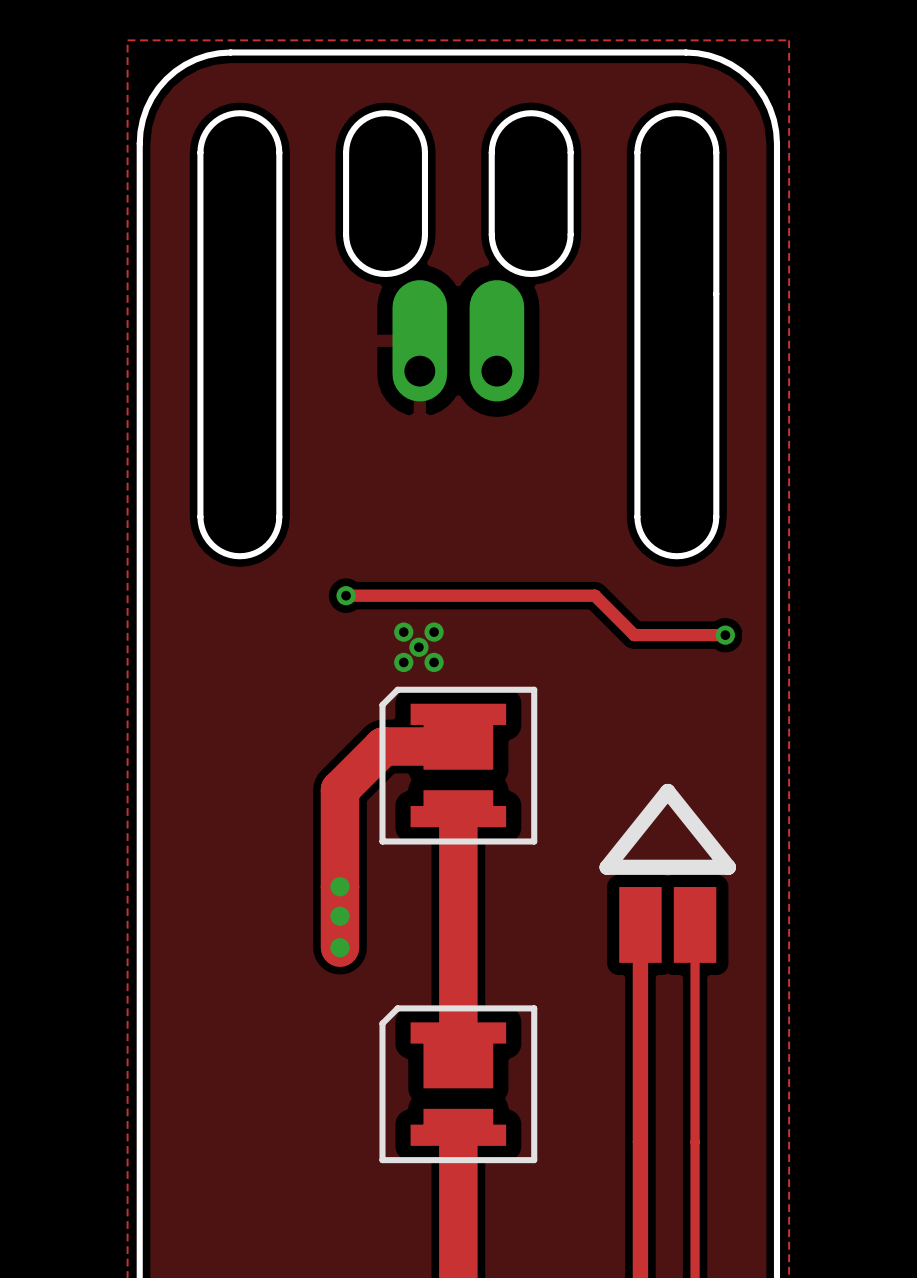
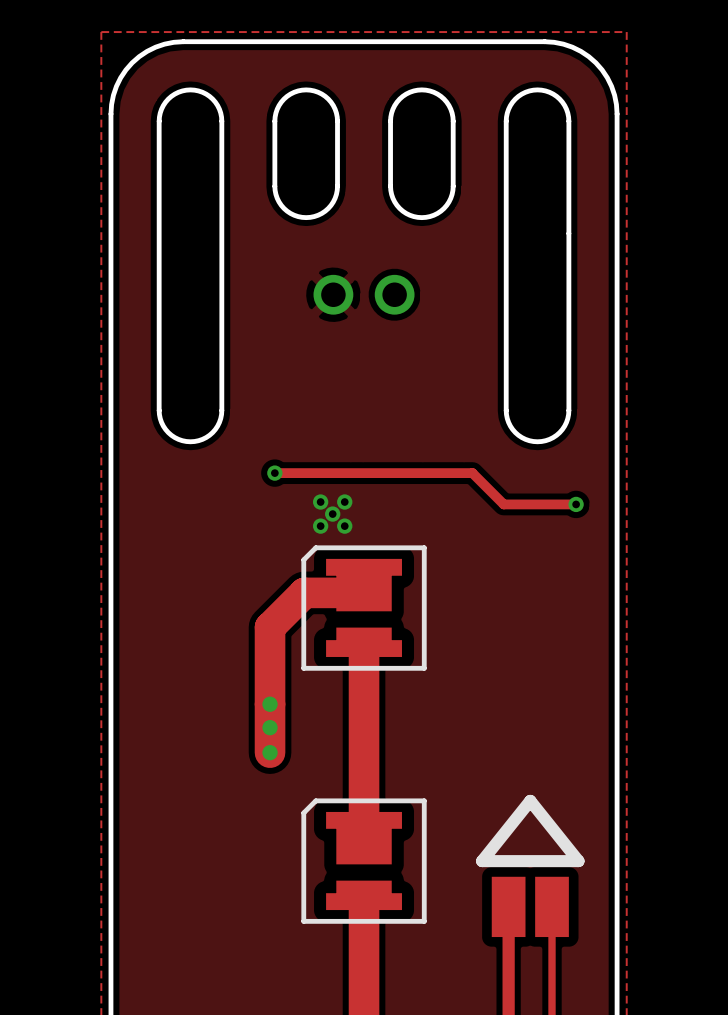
part footprint: [392, 280, 525, 402] -> [313, 274, 415, 315]
line: (667, 791) (607, 867) (728, 867) (667, 791) -> (530, 800) (482, 861) (578, 861) (530, 800)
track: (640, 924) (640, 1141) -> none
part position: (667, 924) -> (530, 906)
track: (695, 924) (695, 1141) -> none

